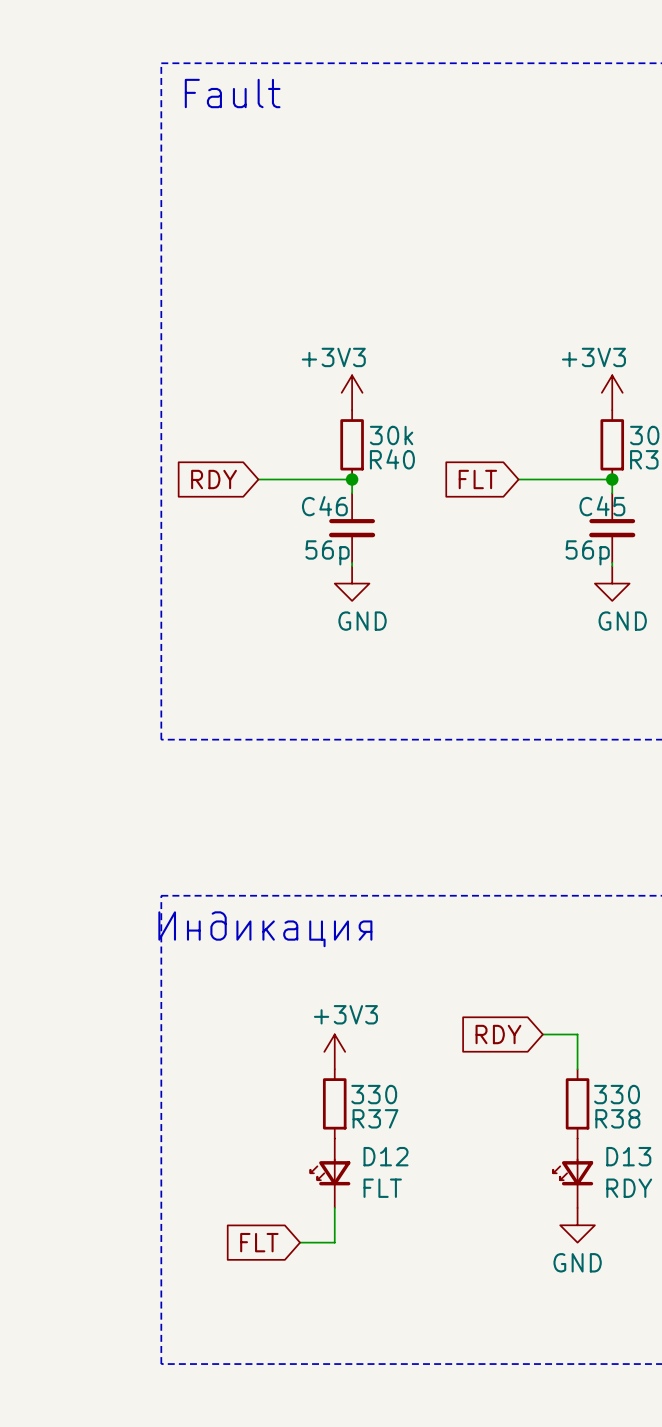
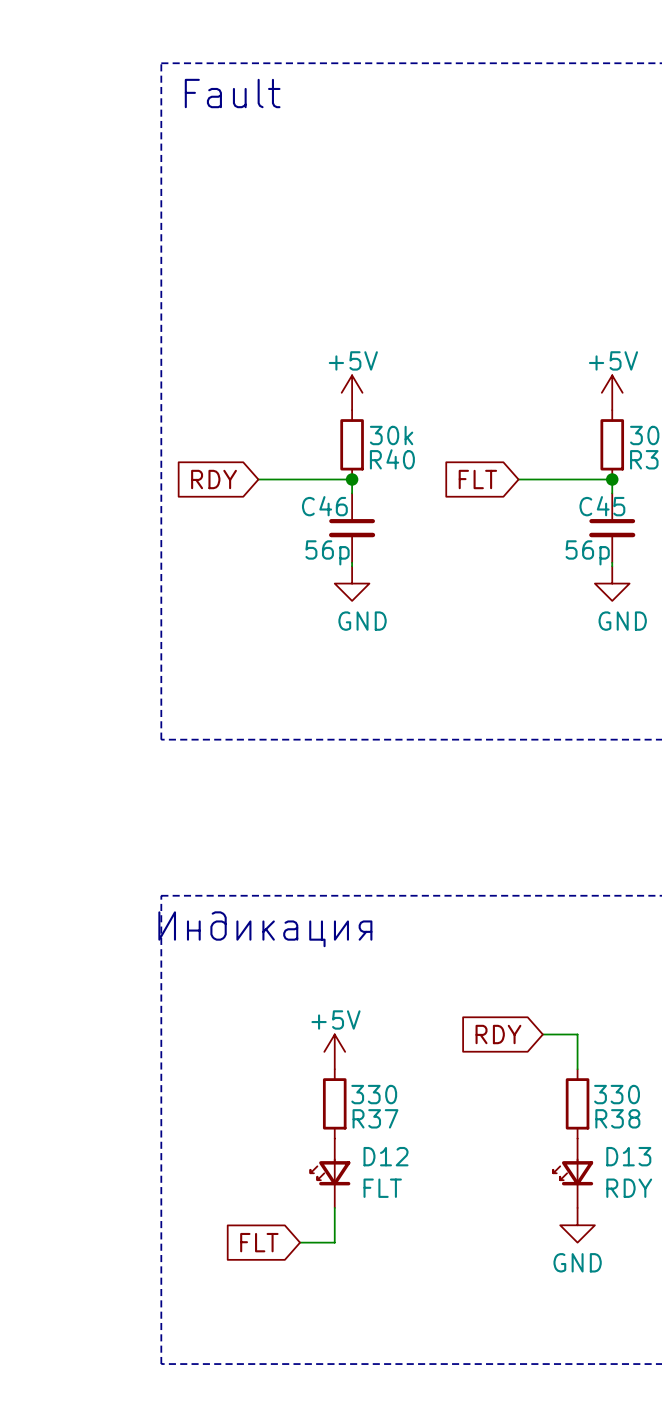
power symbol: +3V3 (352, 392) -> +5V (352, 392)
power symbol: +3V3 (612, 392) -> +5V (612, 392)
power symbol: +3V3 (334, 1051) -> +5V (334, 1051)

